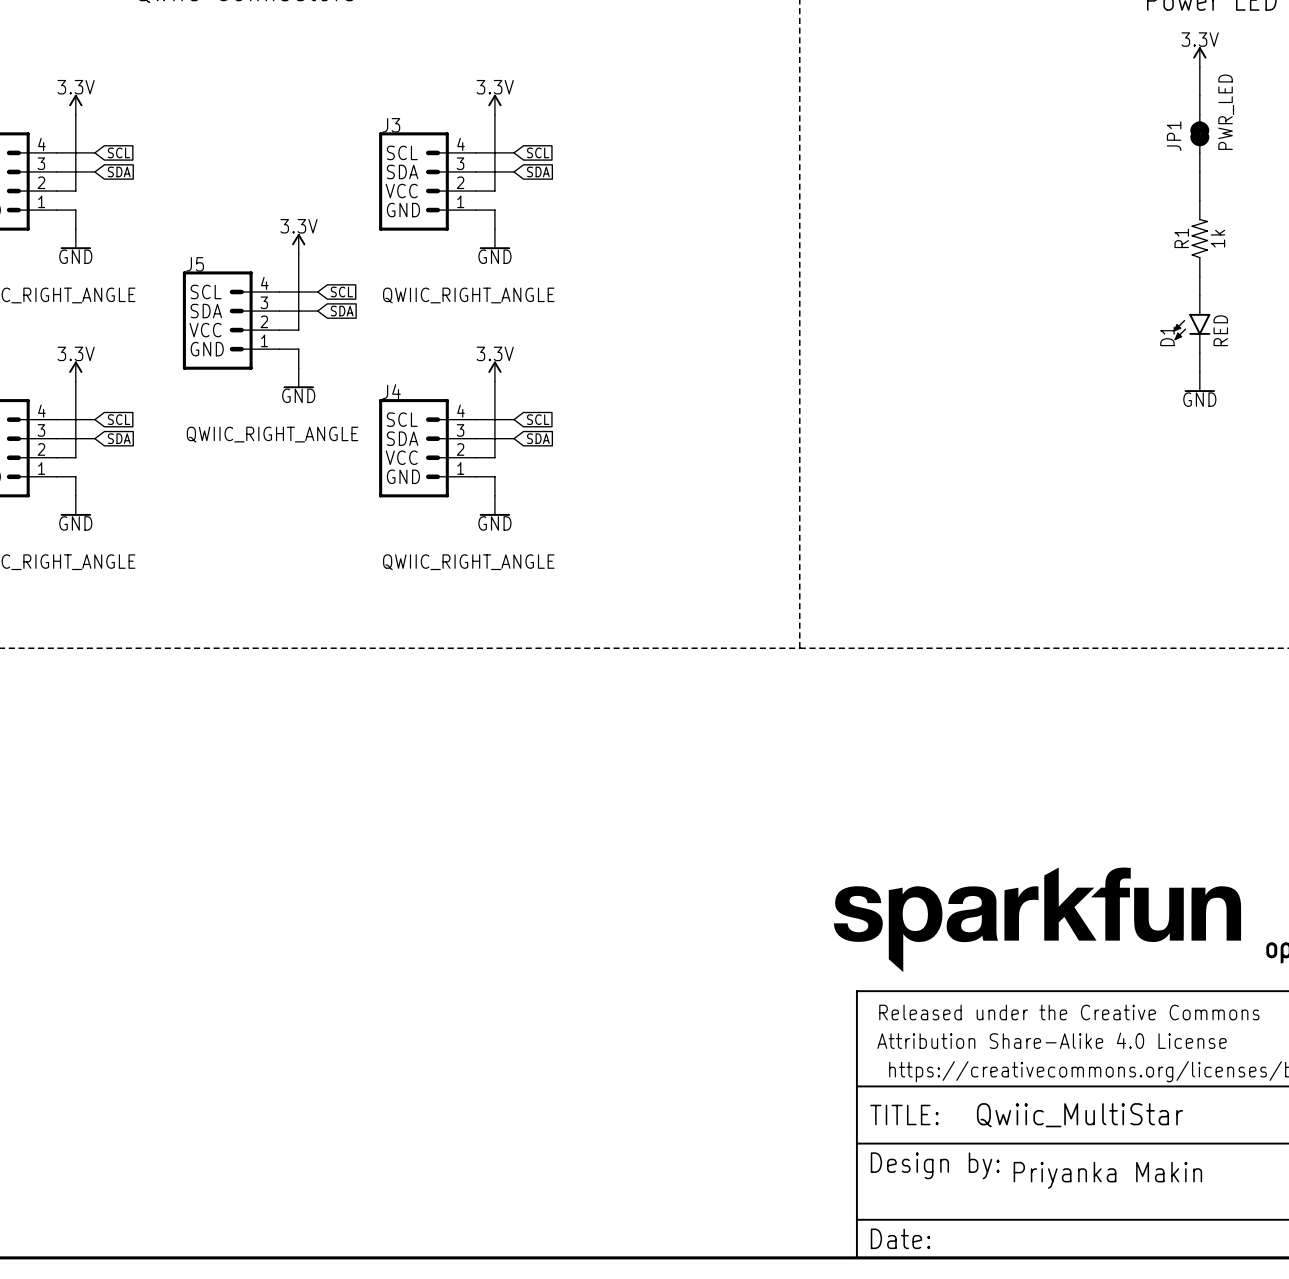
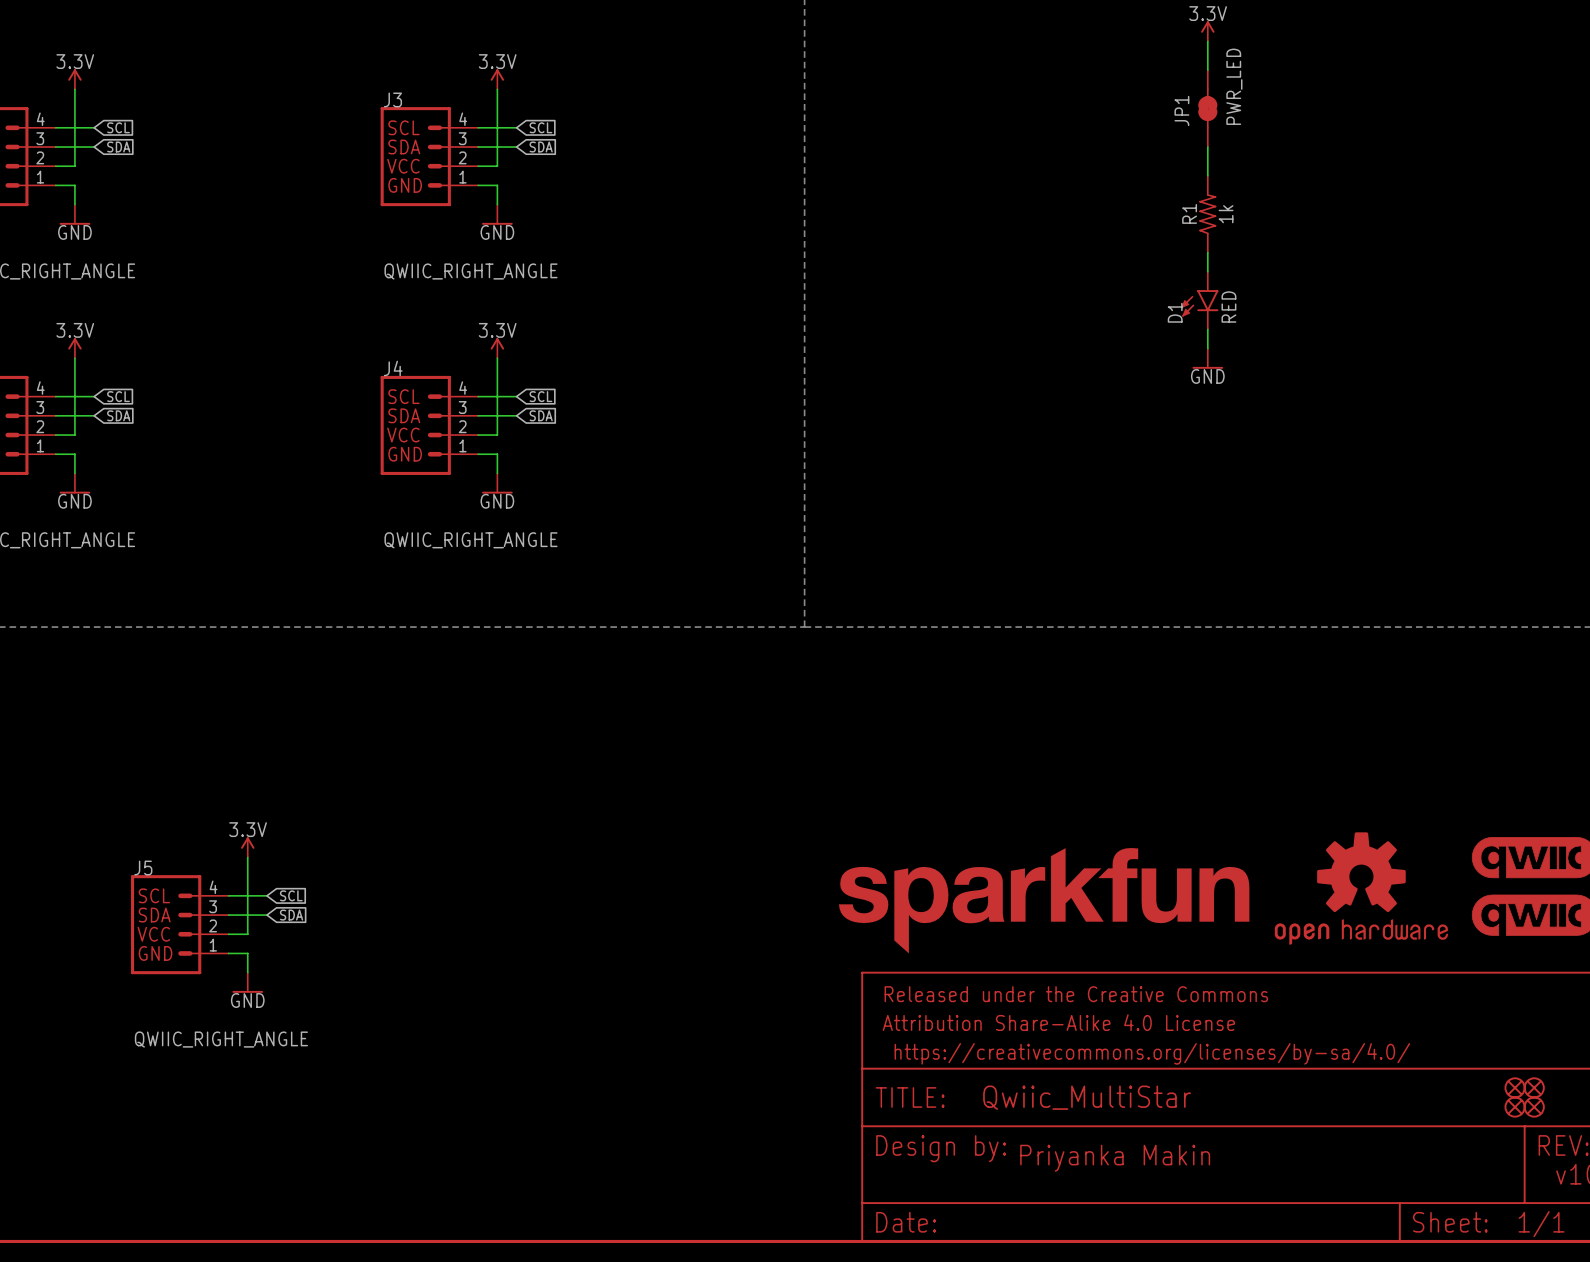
power symbol: 3.3V (298, 243) -> none
wire: (298, 253) (298, 330) (279, 330) -> none
wire: (279, 291) (317, 291) -> none
global label: SCL (341, 291) -> none
wire: (279, 311) (317, 311) -> none
global label: SDA (342, 311) -> none
J5 position: (231, 320) -> (179, 924)
wire: (279, 349) (298, 349) (298, 368) -> none
power symbol: GND (298, 378) -> none
power symbol: none -> 3.3V (247, 847)
wire: none -> (247, 857) (247, 934) (228, 934)
wire: none -> (228, 895) (266, 895)
global label: none -> SCL (291, 895)
wire: none -> (228, 915) (266, 915)
global label: none -> SDA (291, 915)
wire: none -> (228, 953) (247, 953) (247, 972)
power symbol: none -> GND (247, 982)

